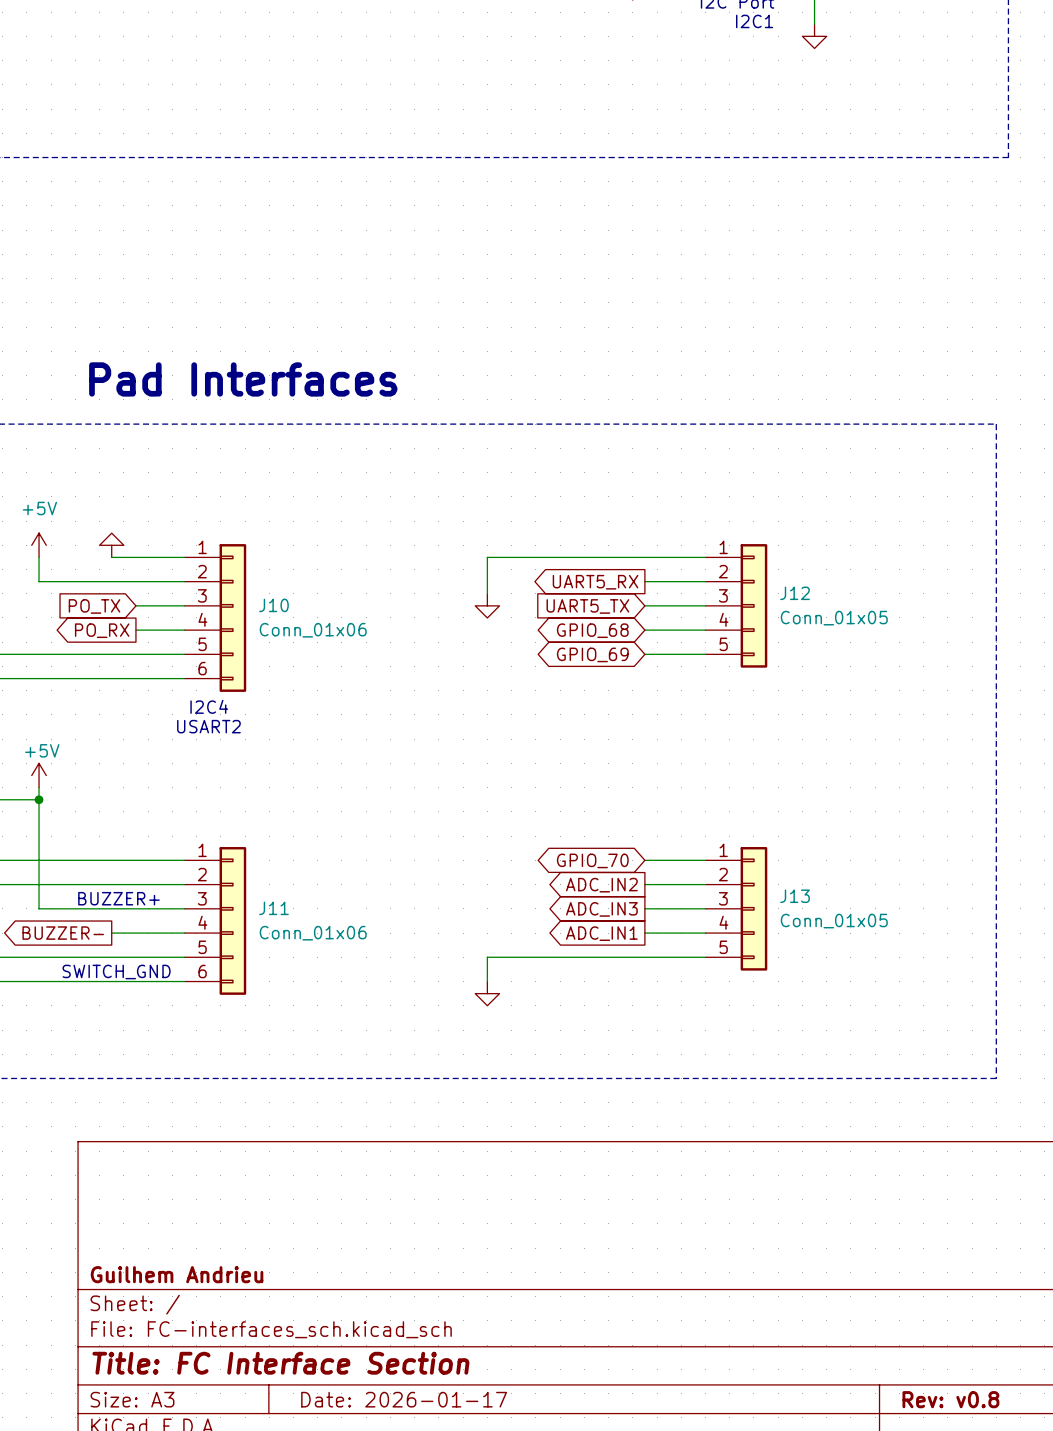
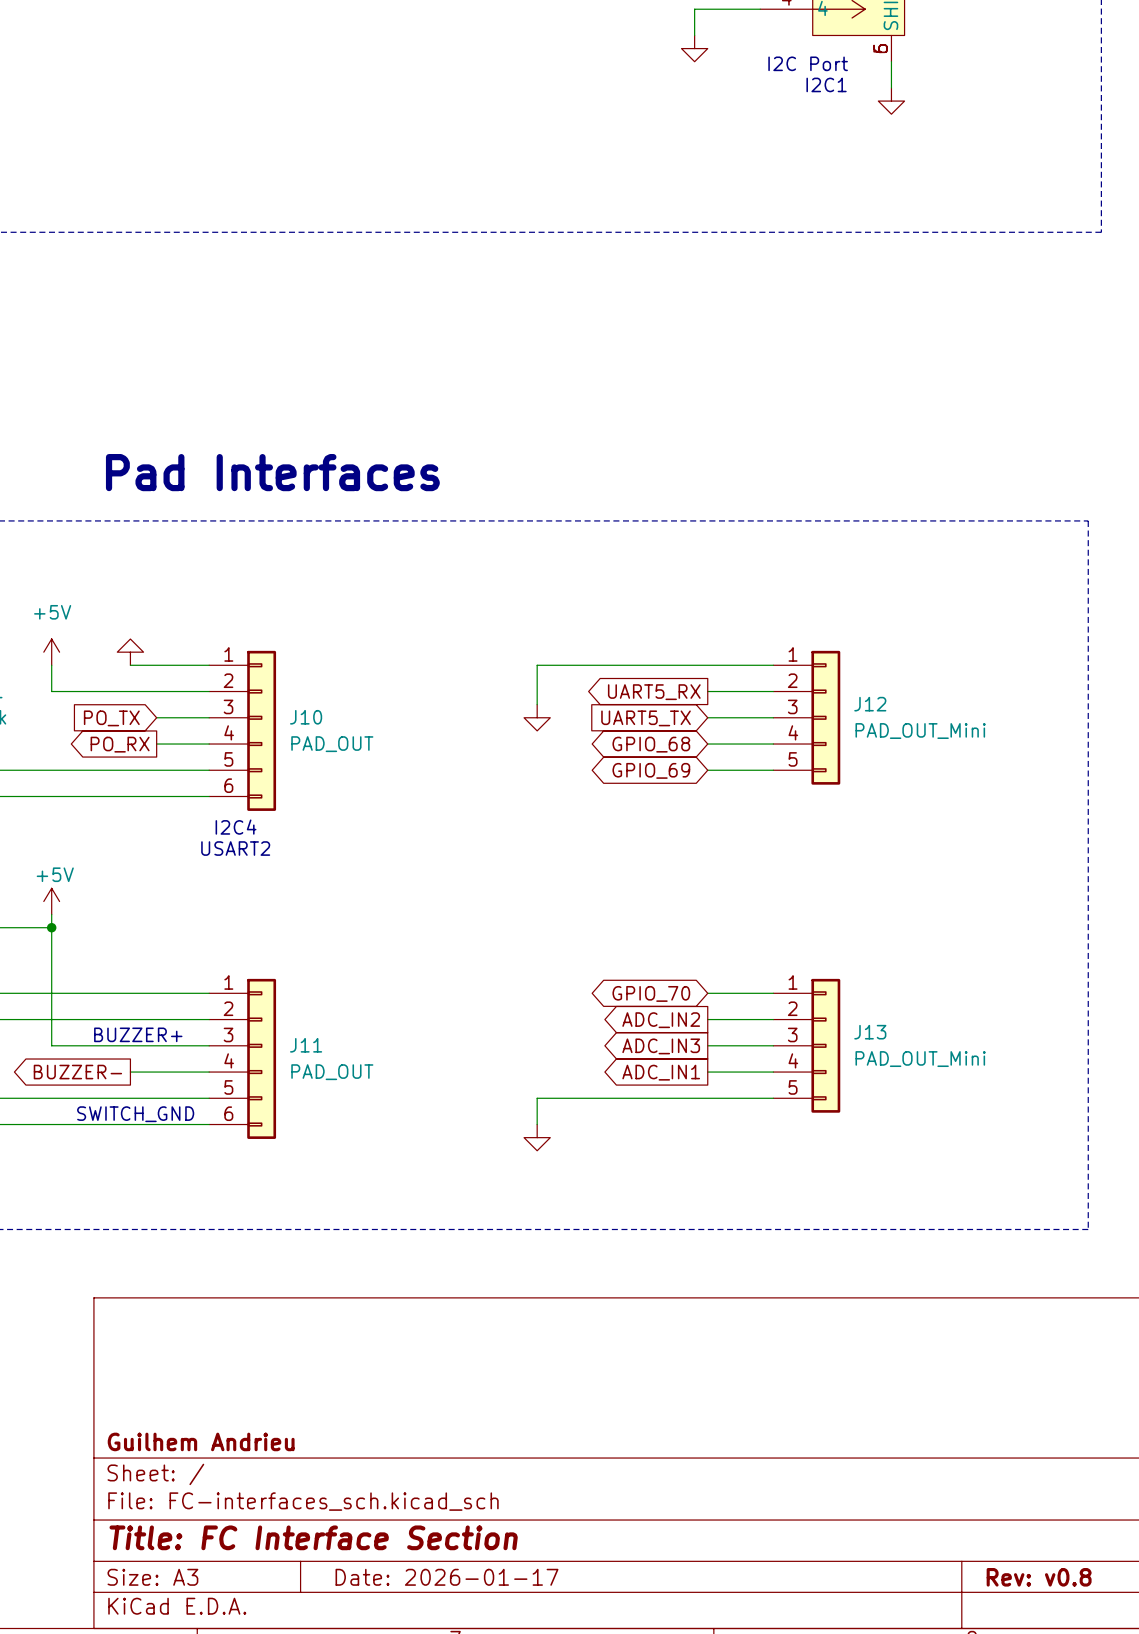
J12 value: Conn_01x05 (834, 618) -> PAD_OUT_Mini (920, 731)
J10 value: Conn_01x06 (313, 630) -> PAD_OUT (332, 744)
J13 value: Conn_01x05 (834, 921) -> PAD_OUT_Mini (920, 1059)
J11 value: Conn_01x06 (313, 933) -> PAD_OUT (332, 1072)

